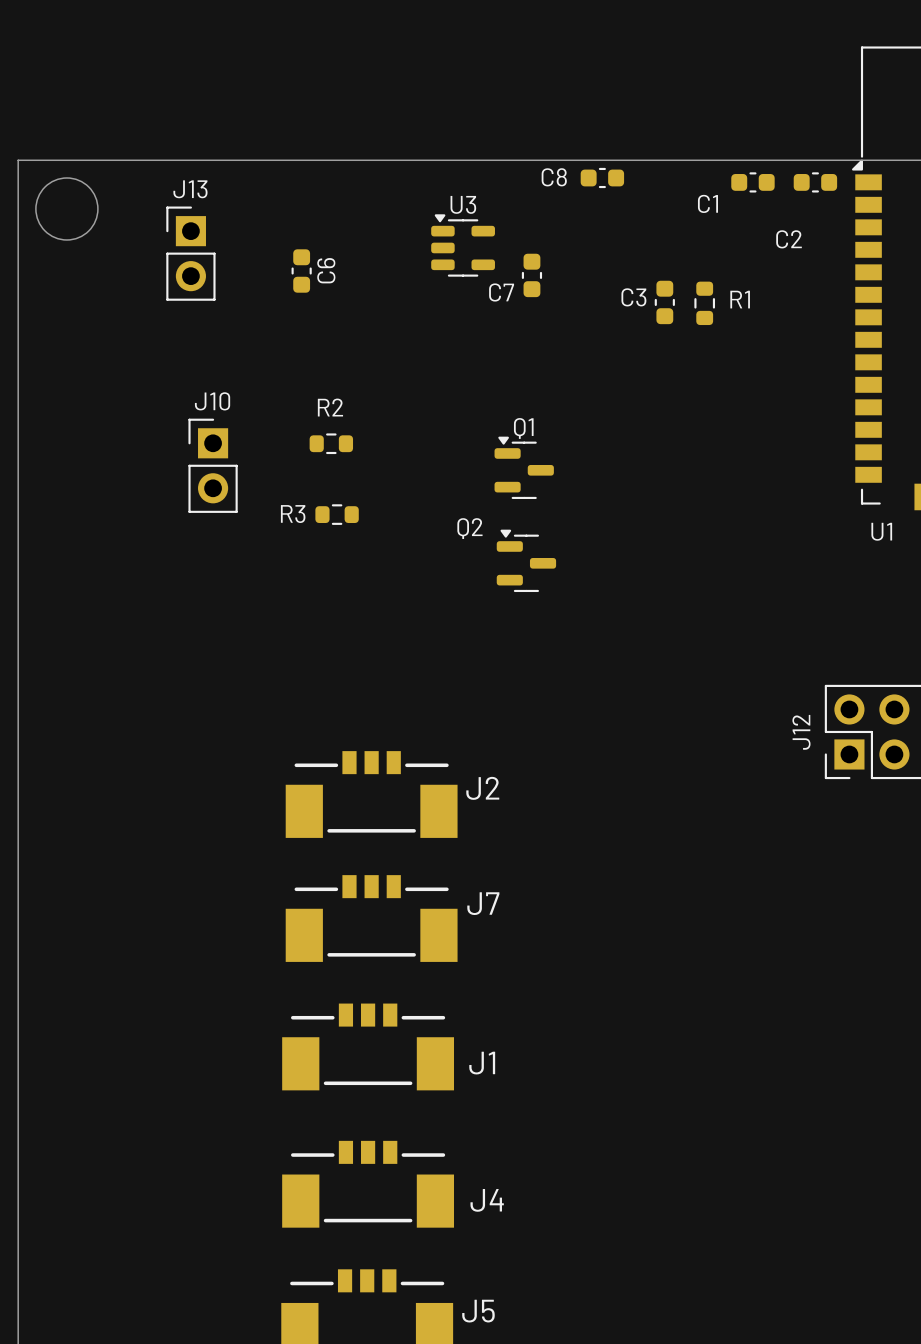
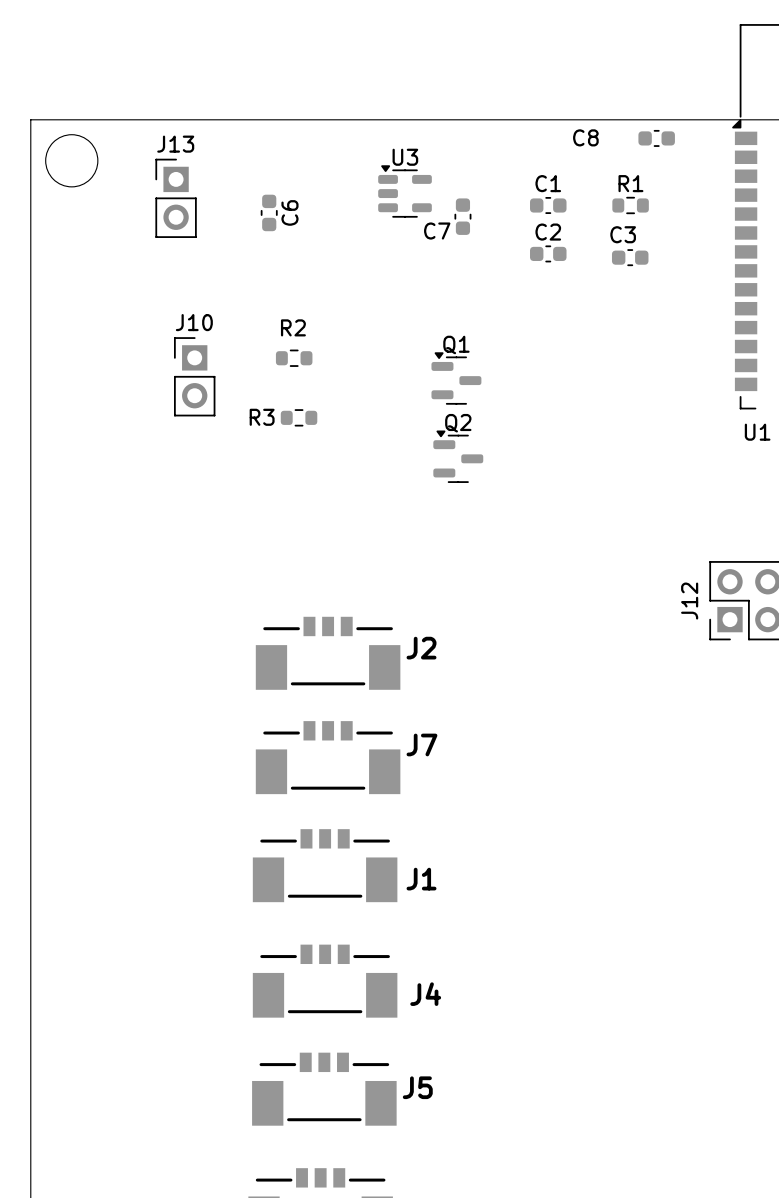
C8 name position: C8 (554, 177) -> C8 (585, 137)
C8 position: (602, 177) -> (656, 138)
C1 position: (752, 182) -> (548, 205)
C2 position: (815, 182) -> (548, 253)
C1 name position: C1 (707, 203) -> C1 (548, 183)
C2 name position: C2 (789, 239) -> C2 (548, 232)
R1 name position: R1 (740, 299) -> R1 (630, 183)
C3 rotation: 0° (664, 302) -> 90° clockwise (630, 257)
C3 position: (664, 302) -> (630, 257)
R1 rotation: 0° (704, 303) -> 90° clockwise (630, 205)
R1 position: (704, 303) -> (630, 205)
Q2 name position: Q2 (469, 528) -> Q2 (458, 423)

